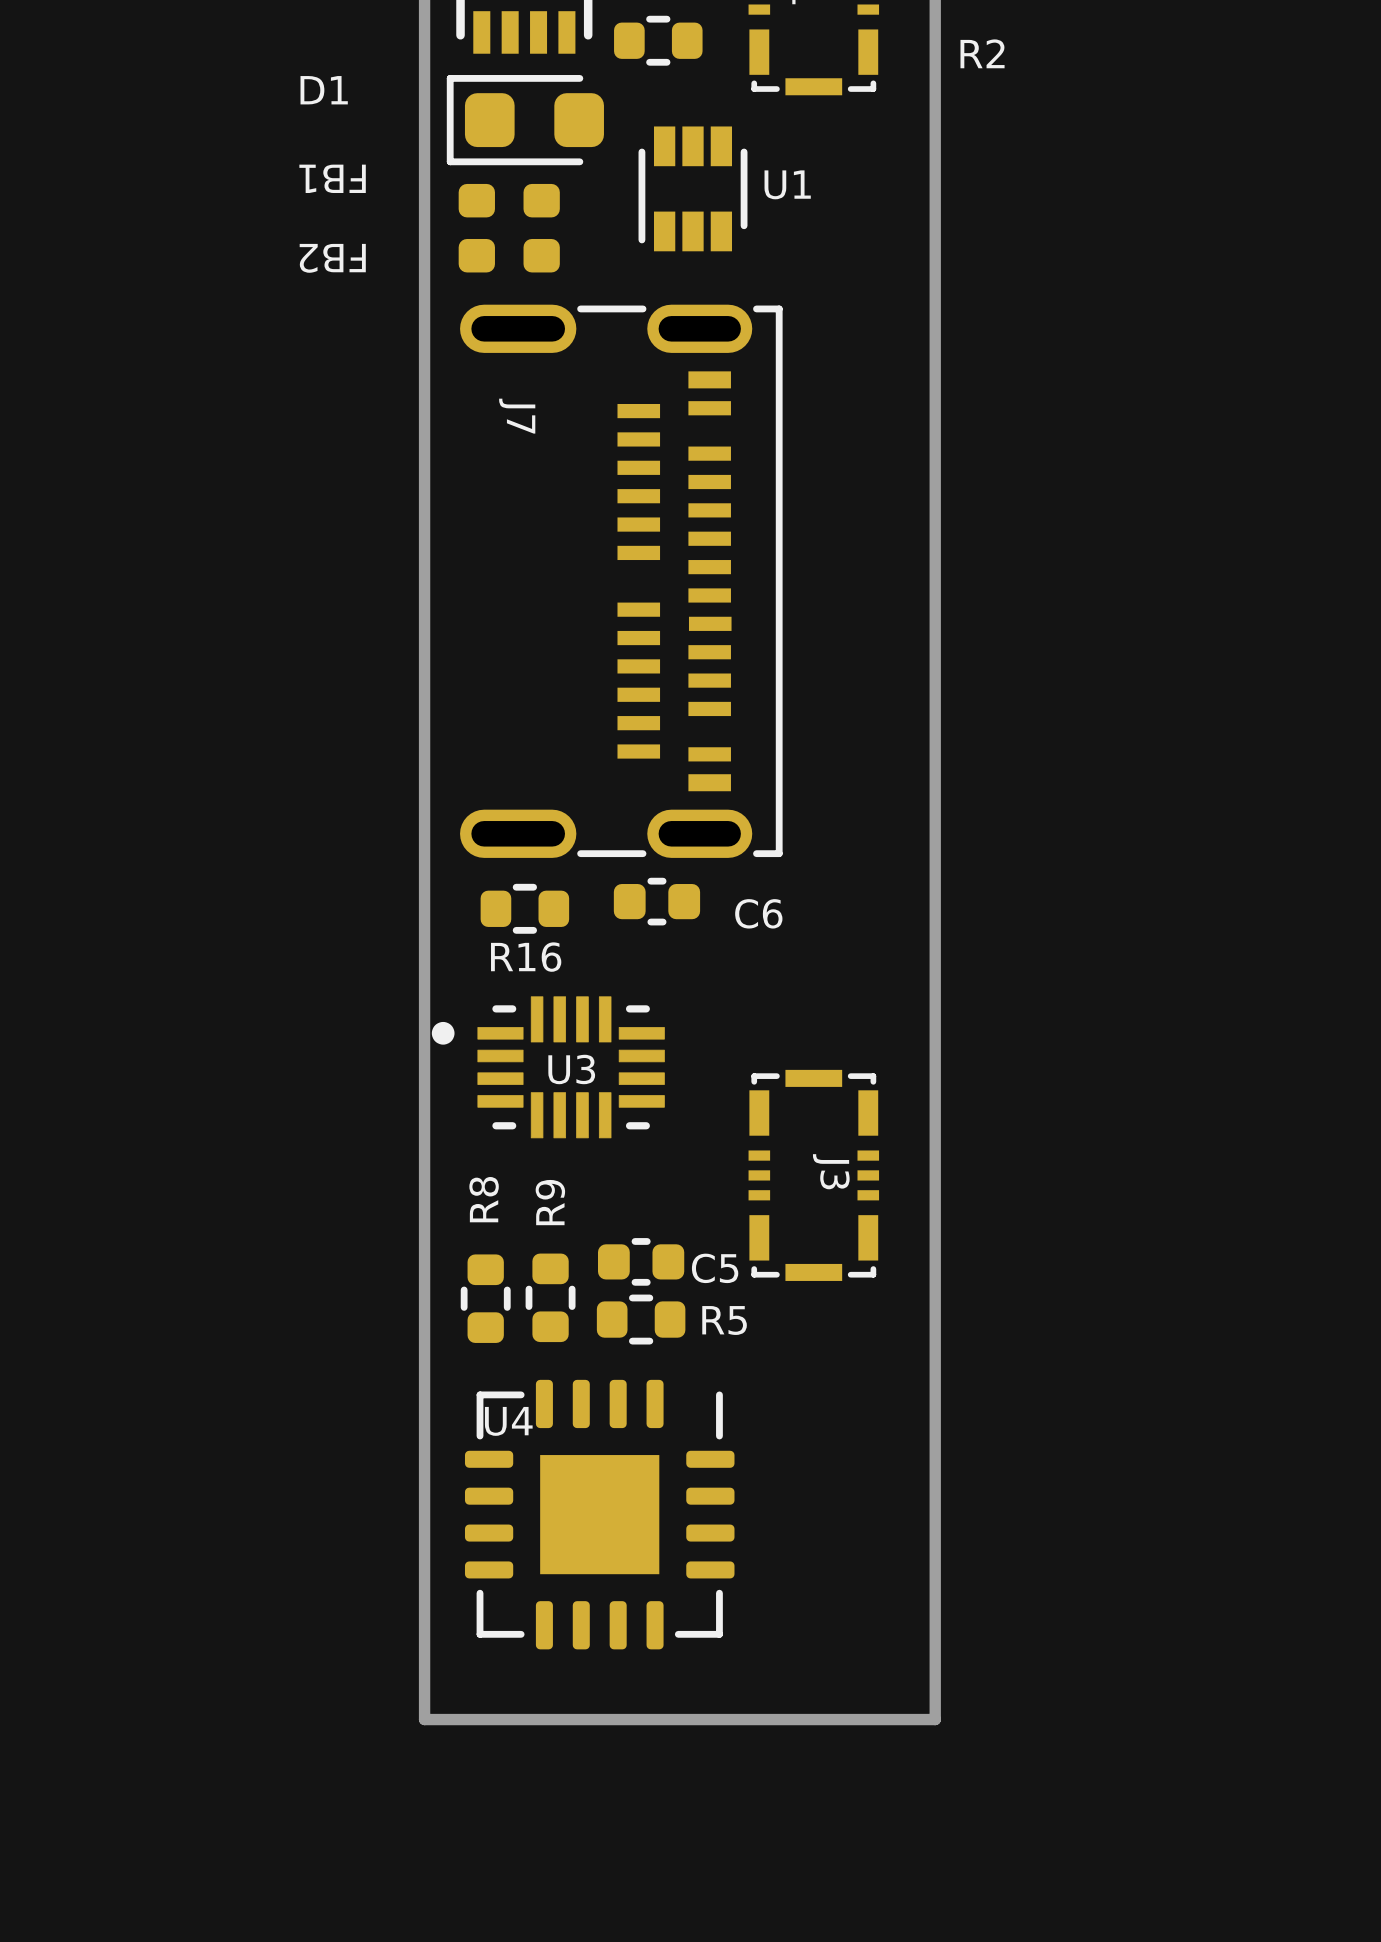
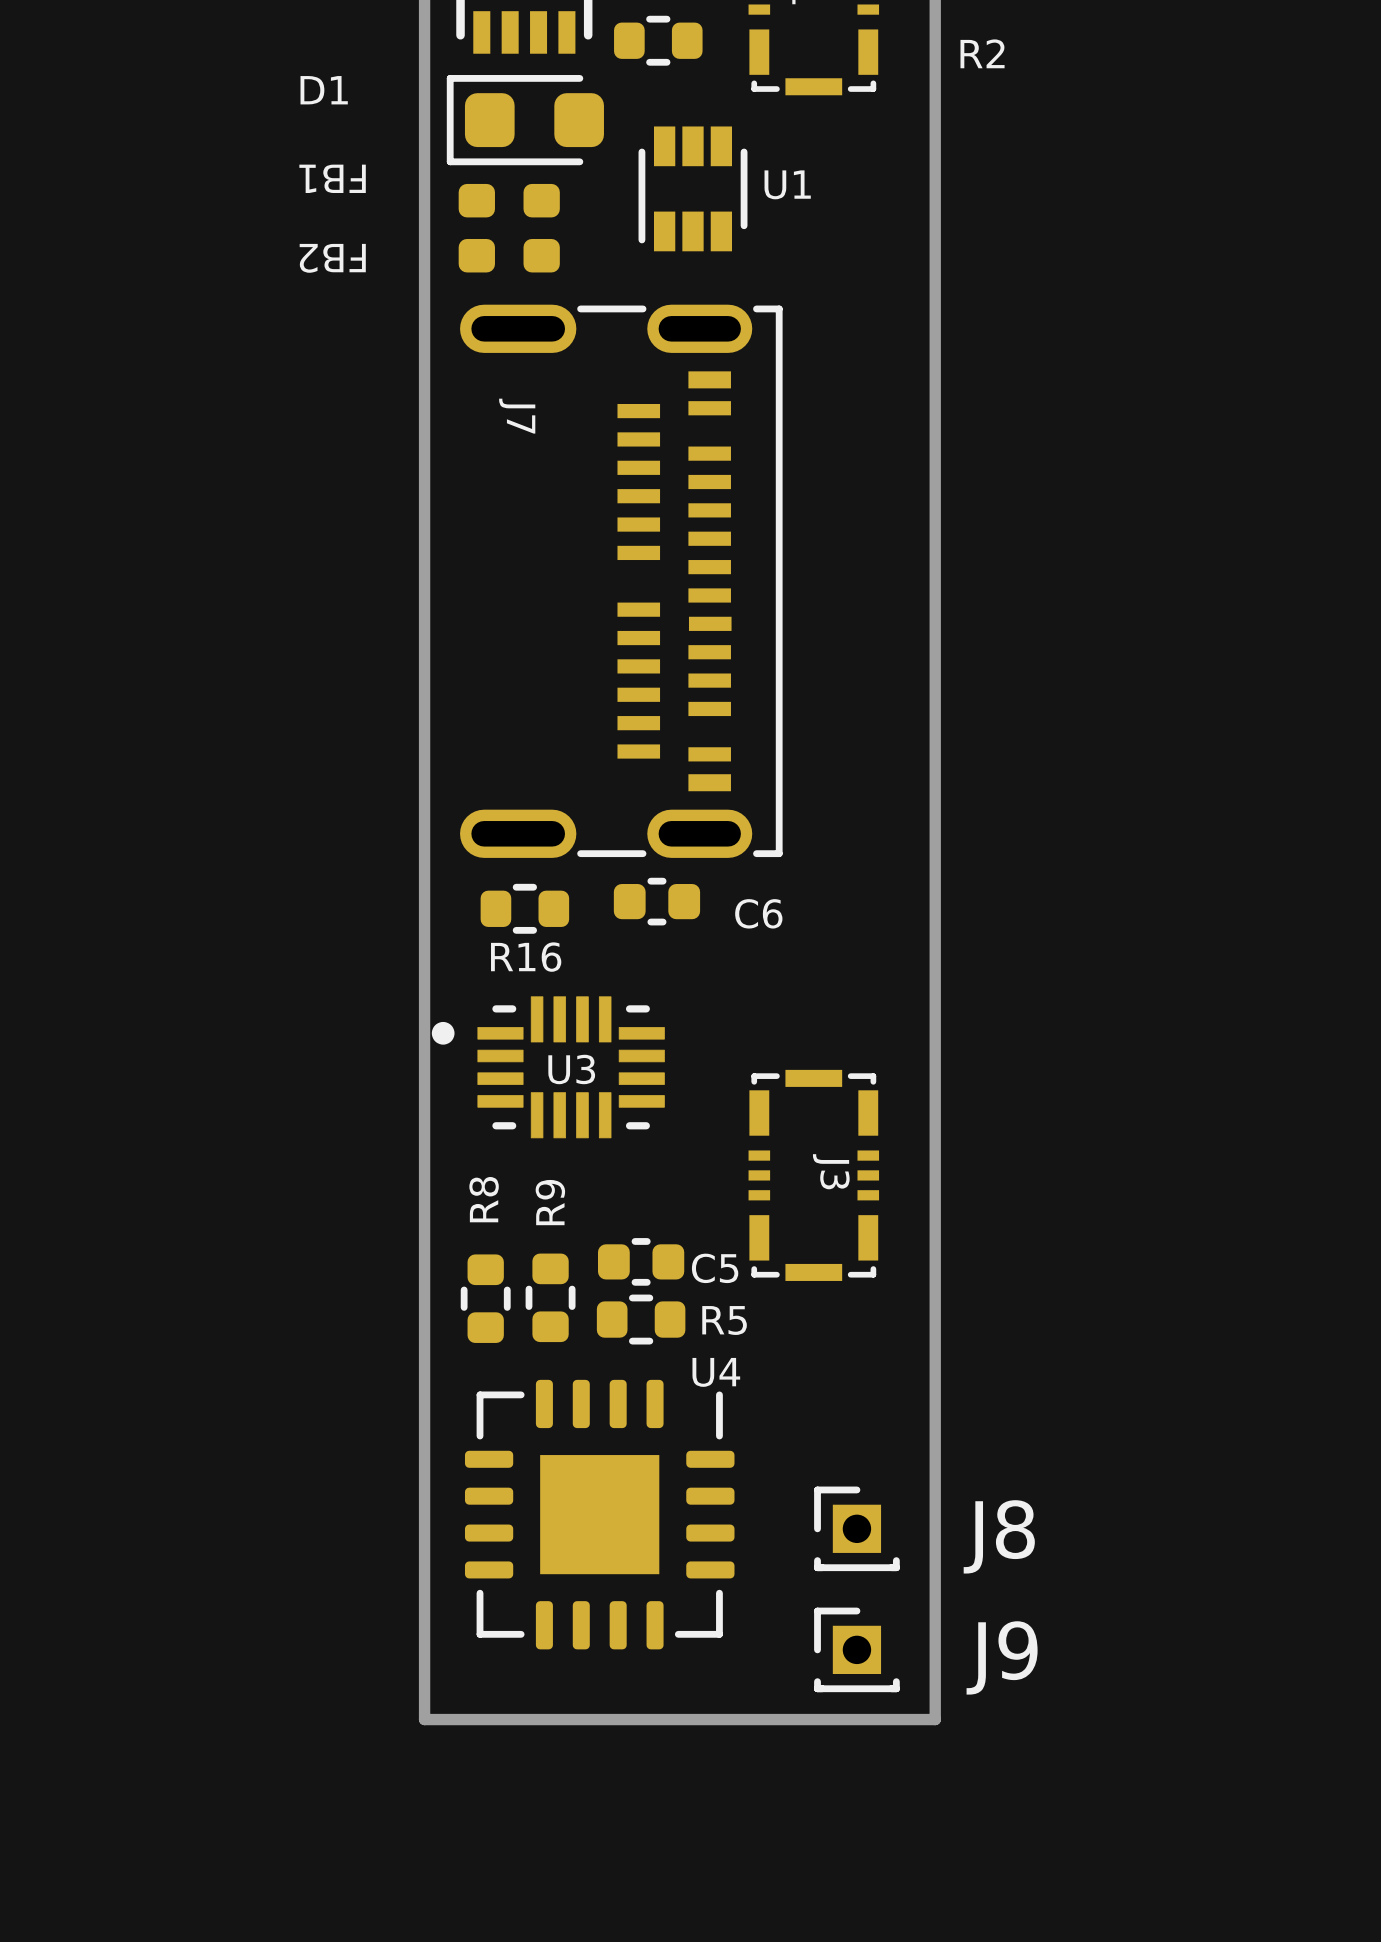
U4 name position: U4 (508, 1421) -> U4 (716, 1372)
J8: none -> (856, 1528)
J9: none -> (856, 1649)

